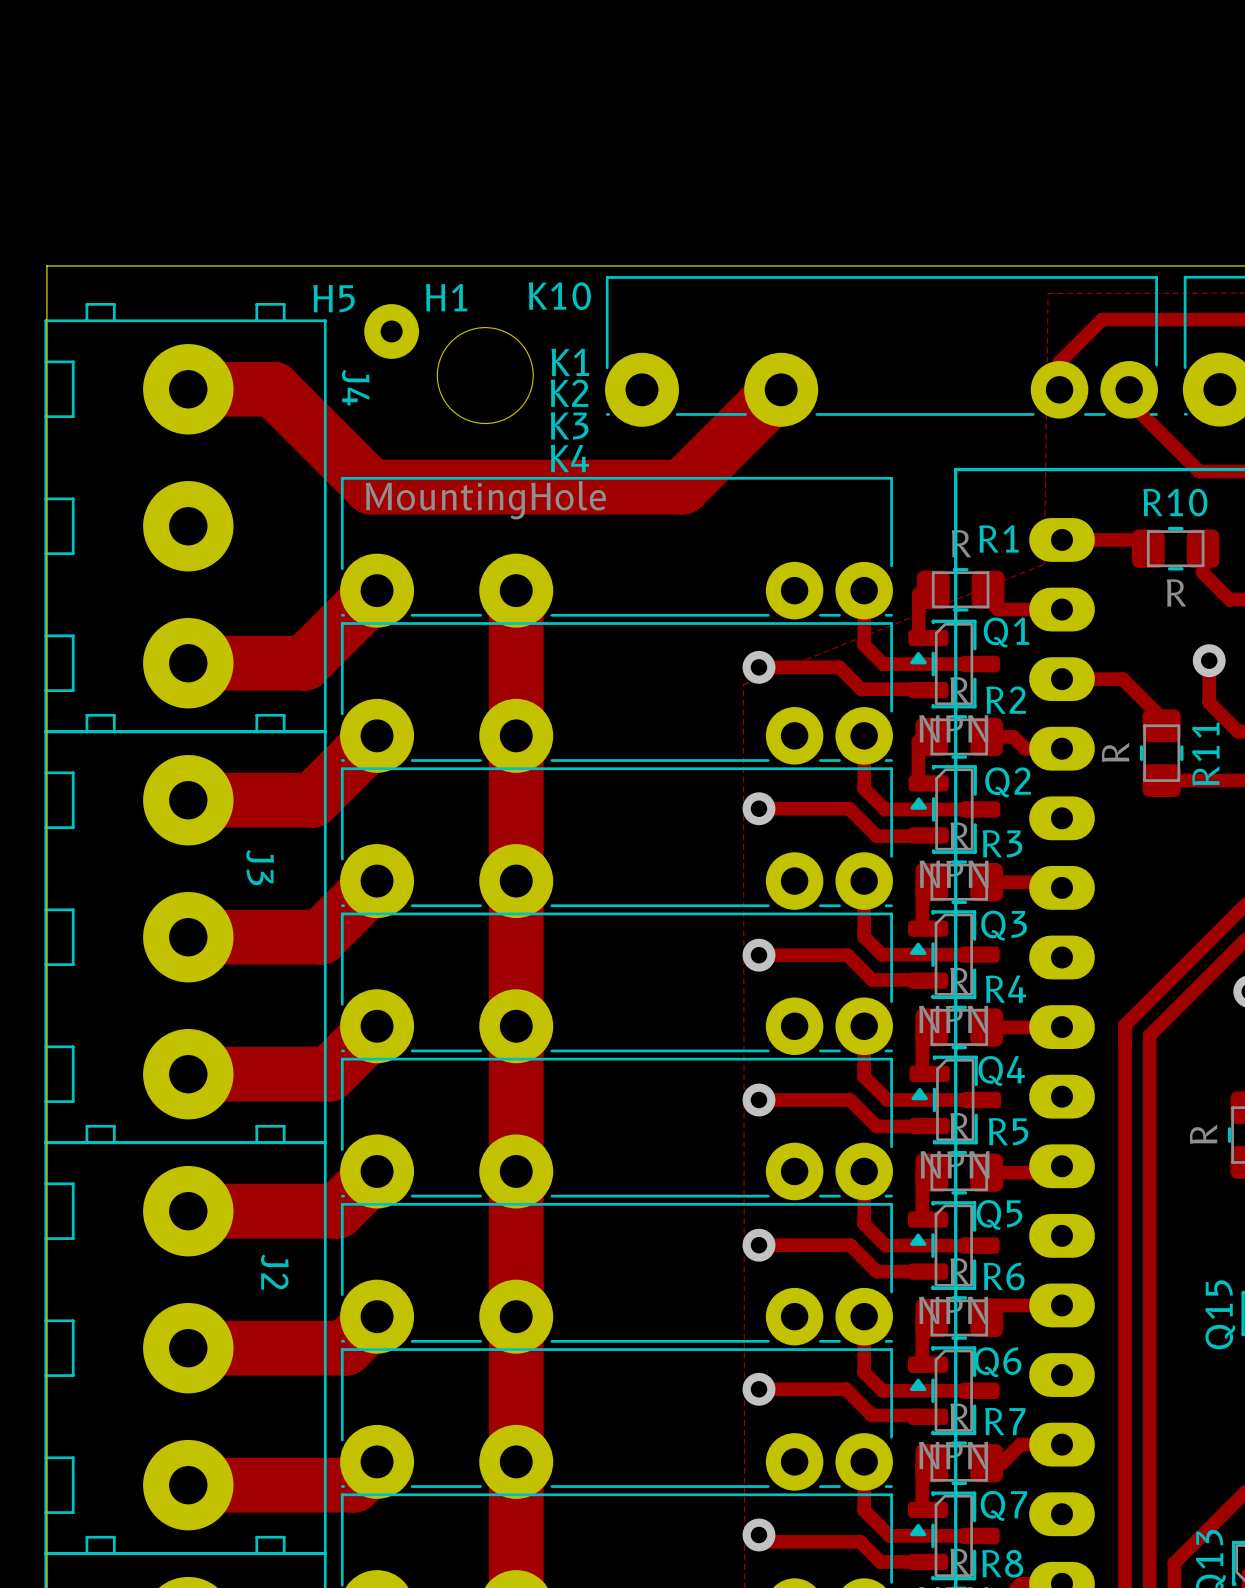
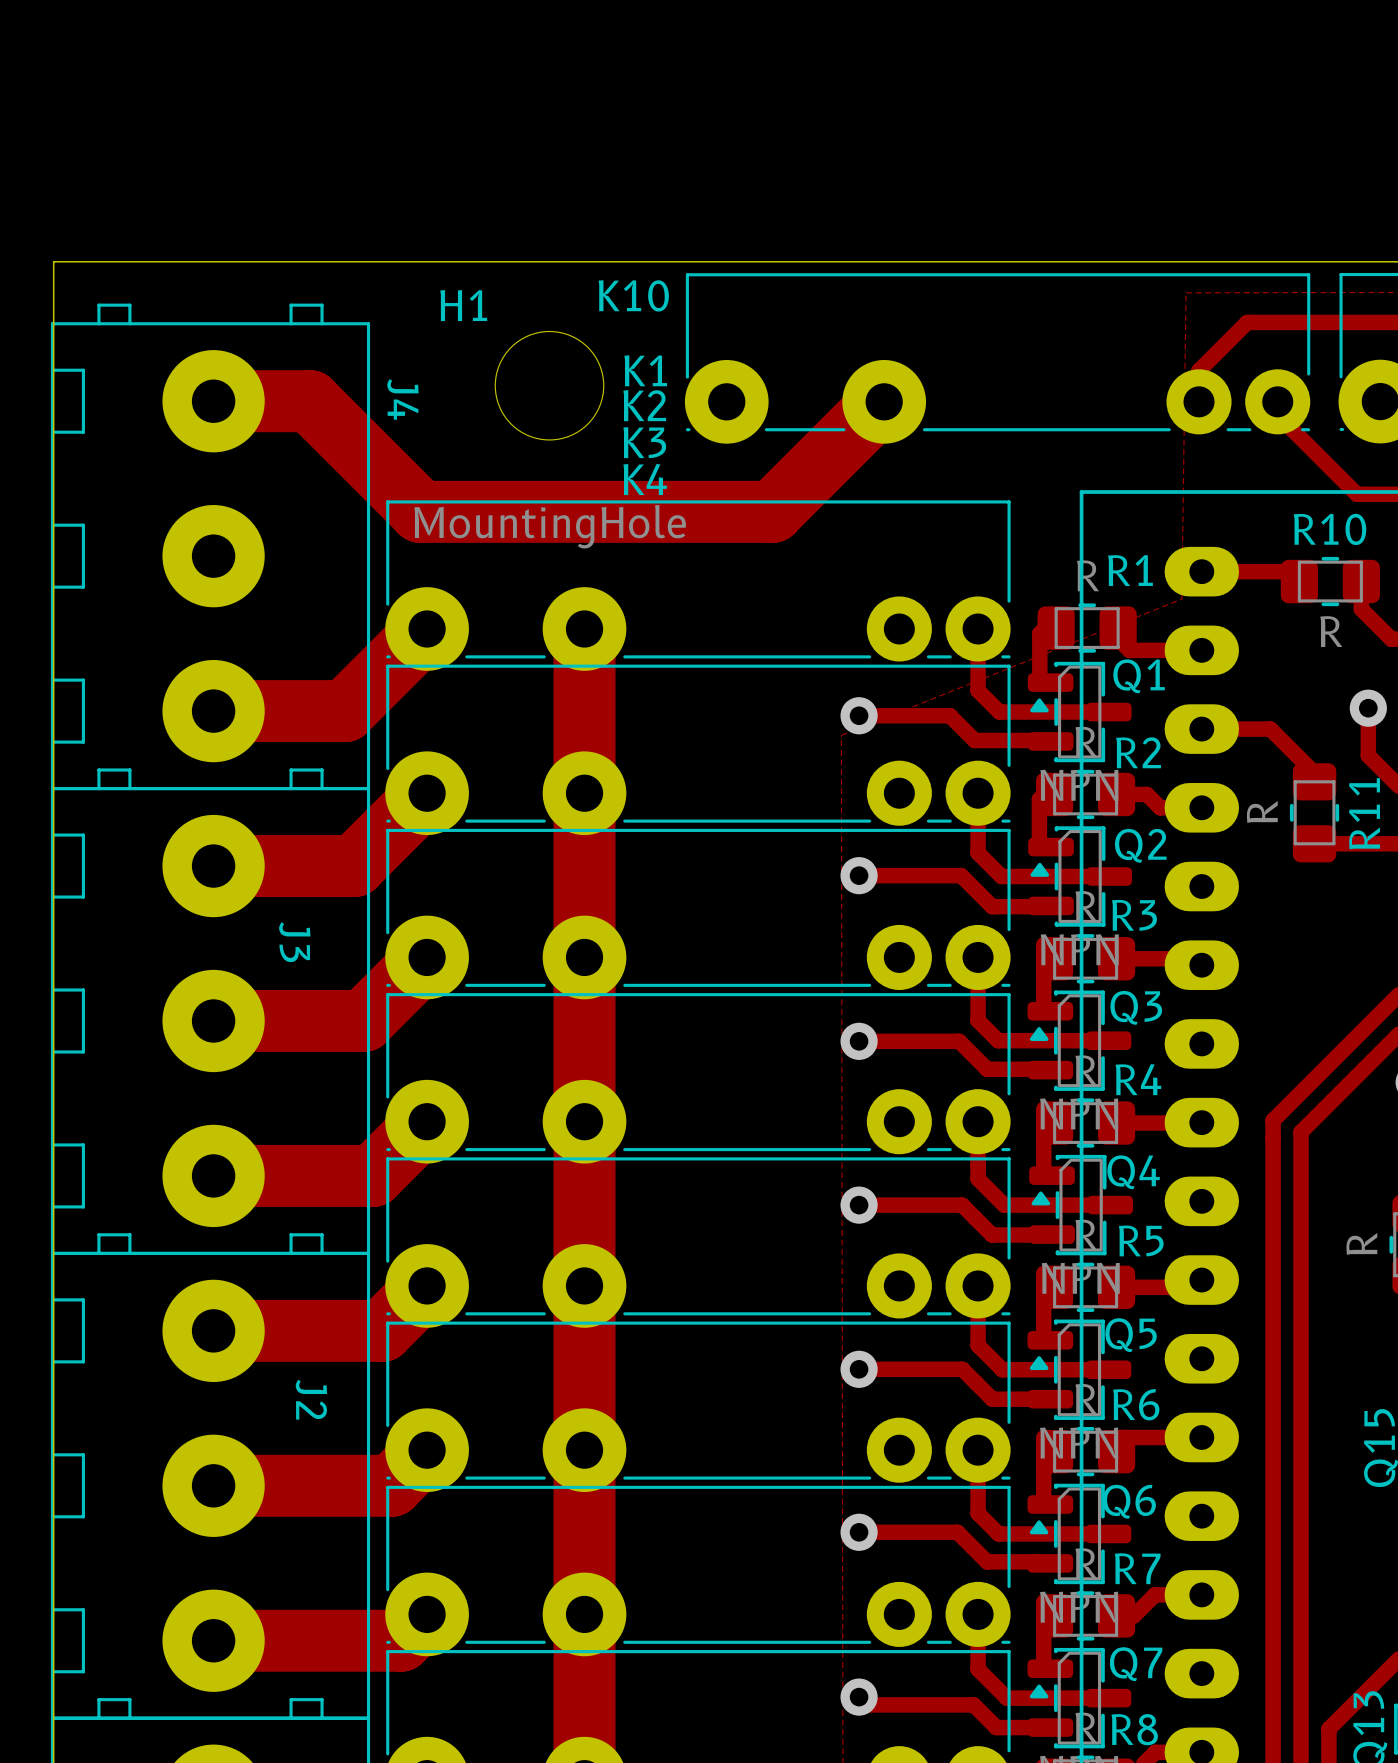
H1 name position: H1 (446, 297) -> H1 (463, 305)
H5: (391, 331) -> none

